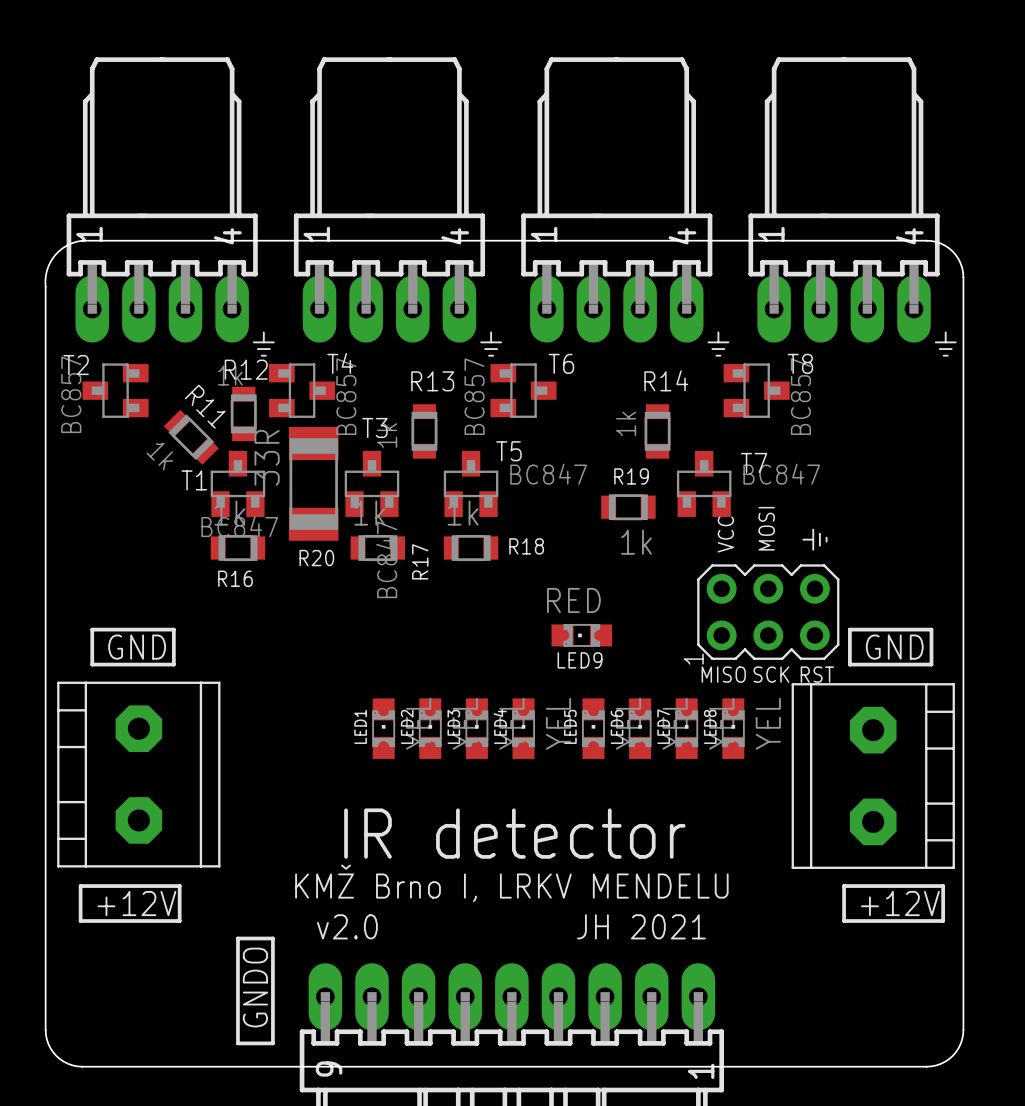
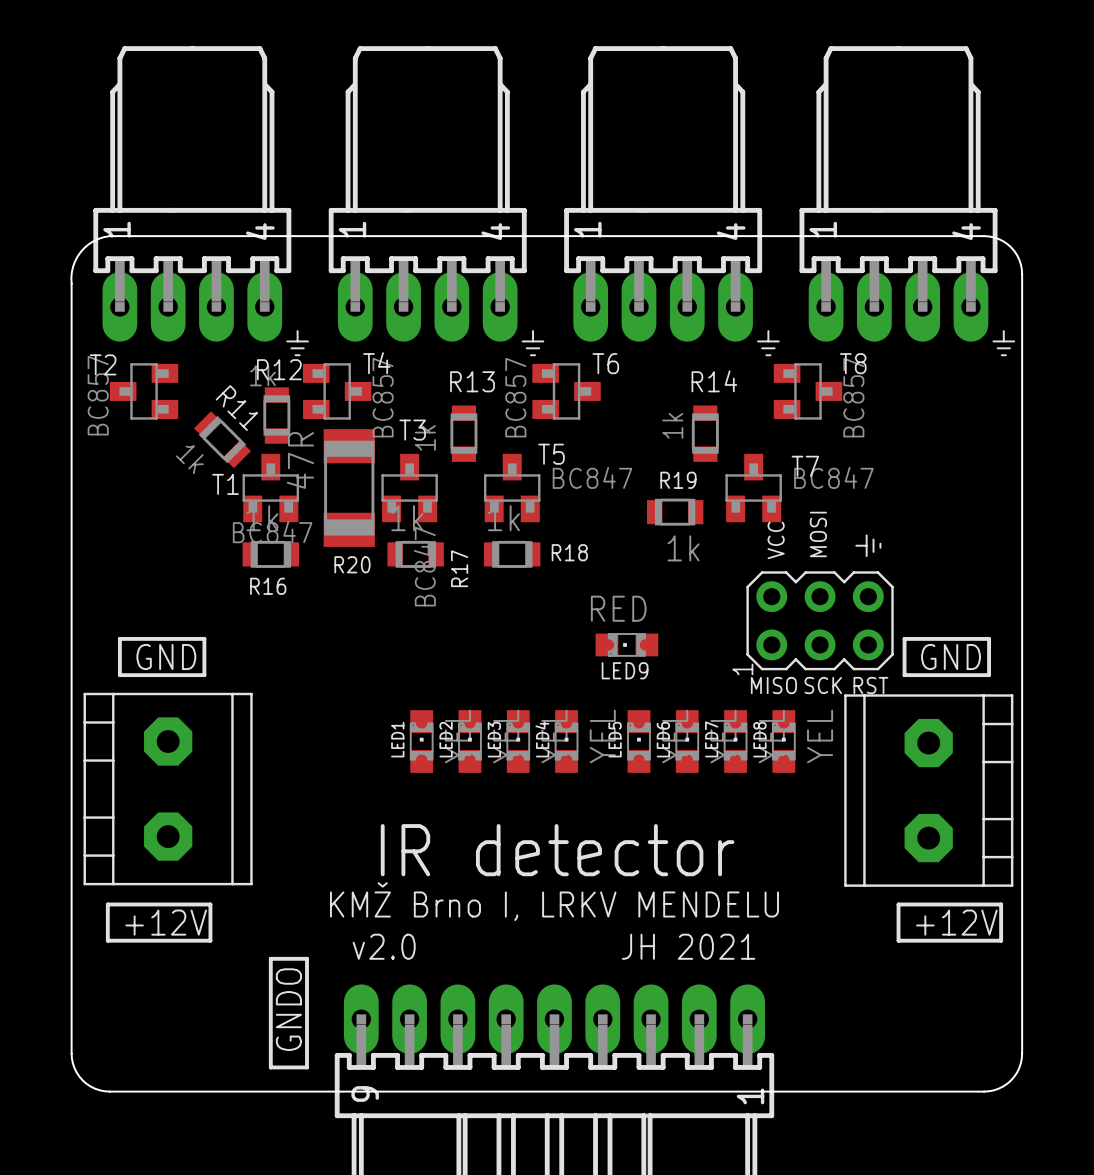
R20 value: 33R (267, 457) -> 47R (300, 460)

